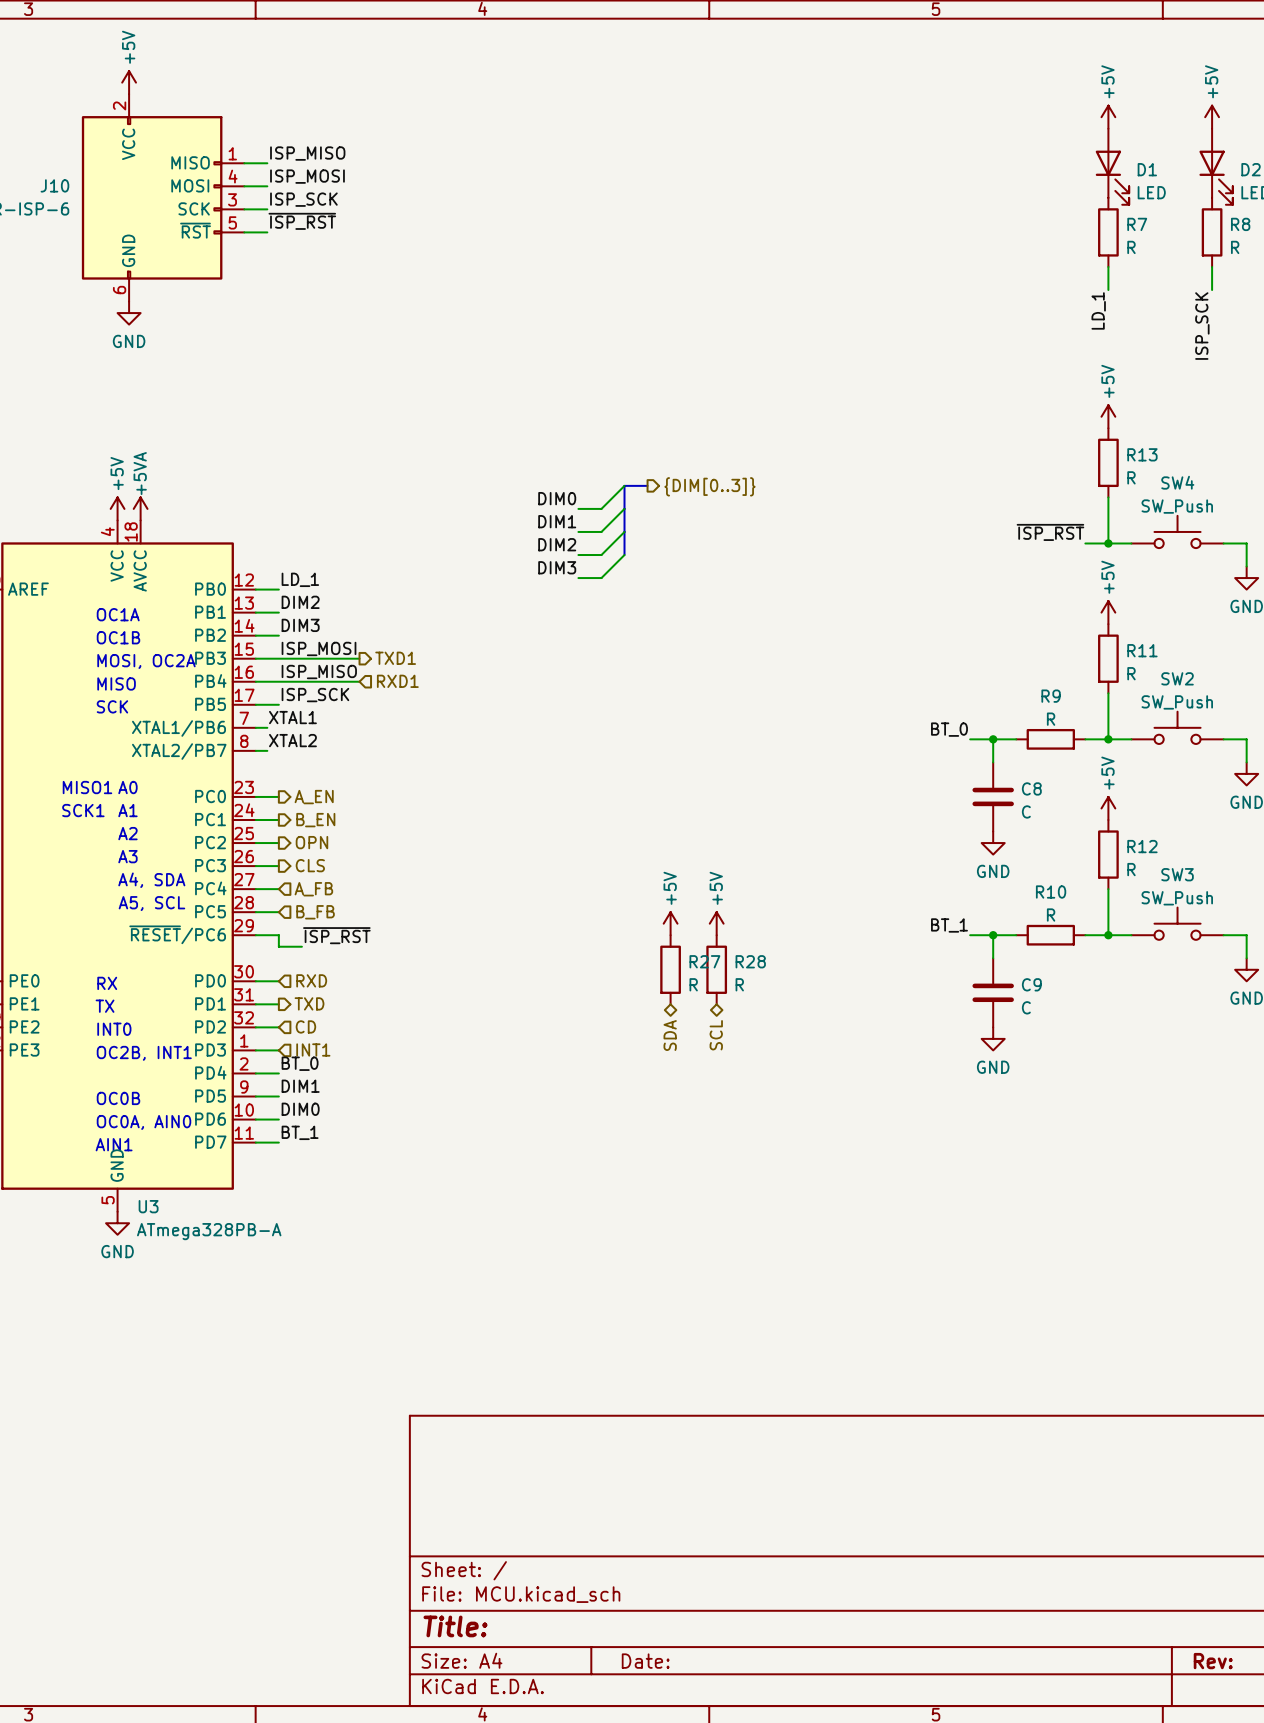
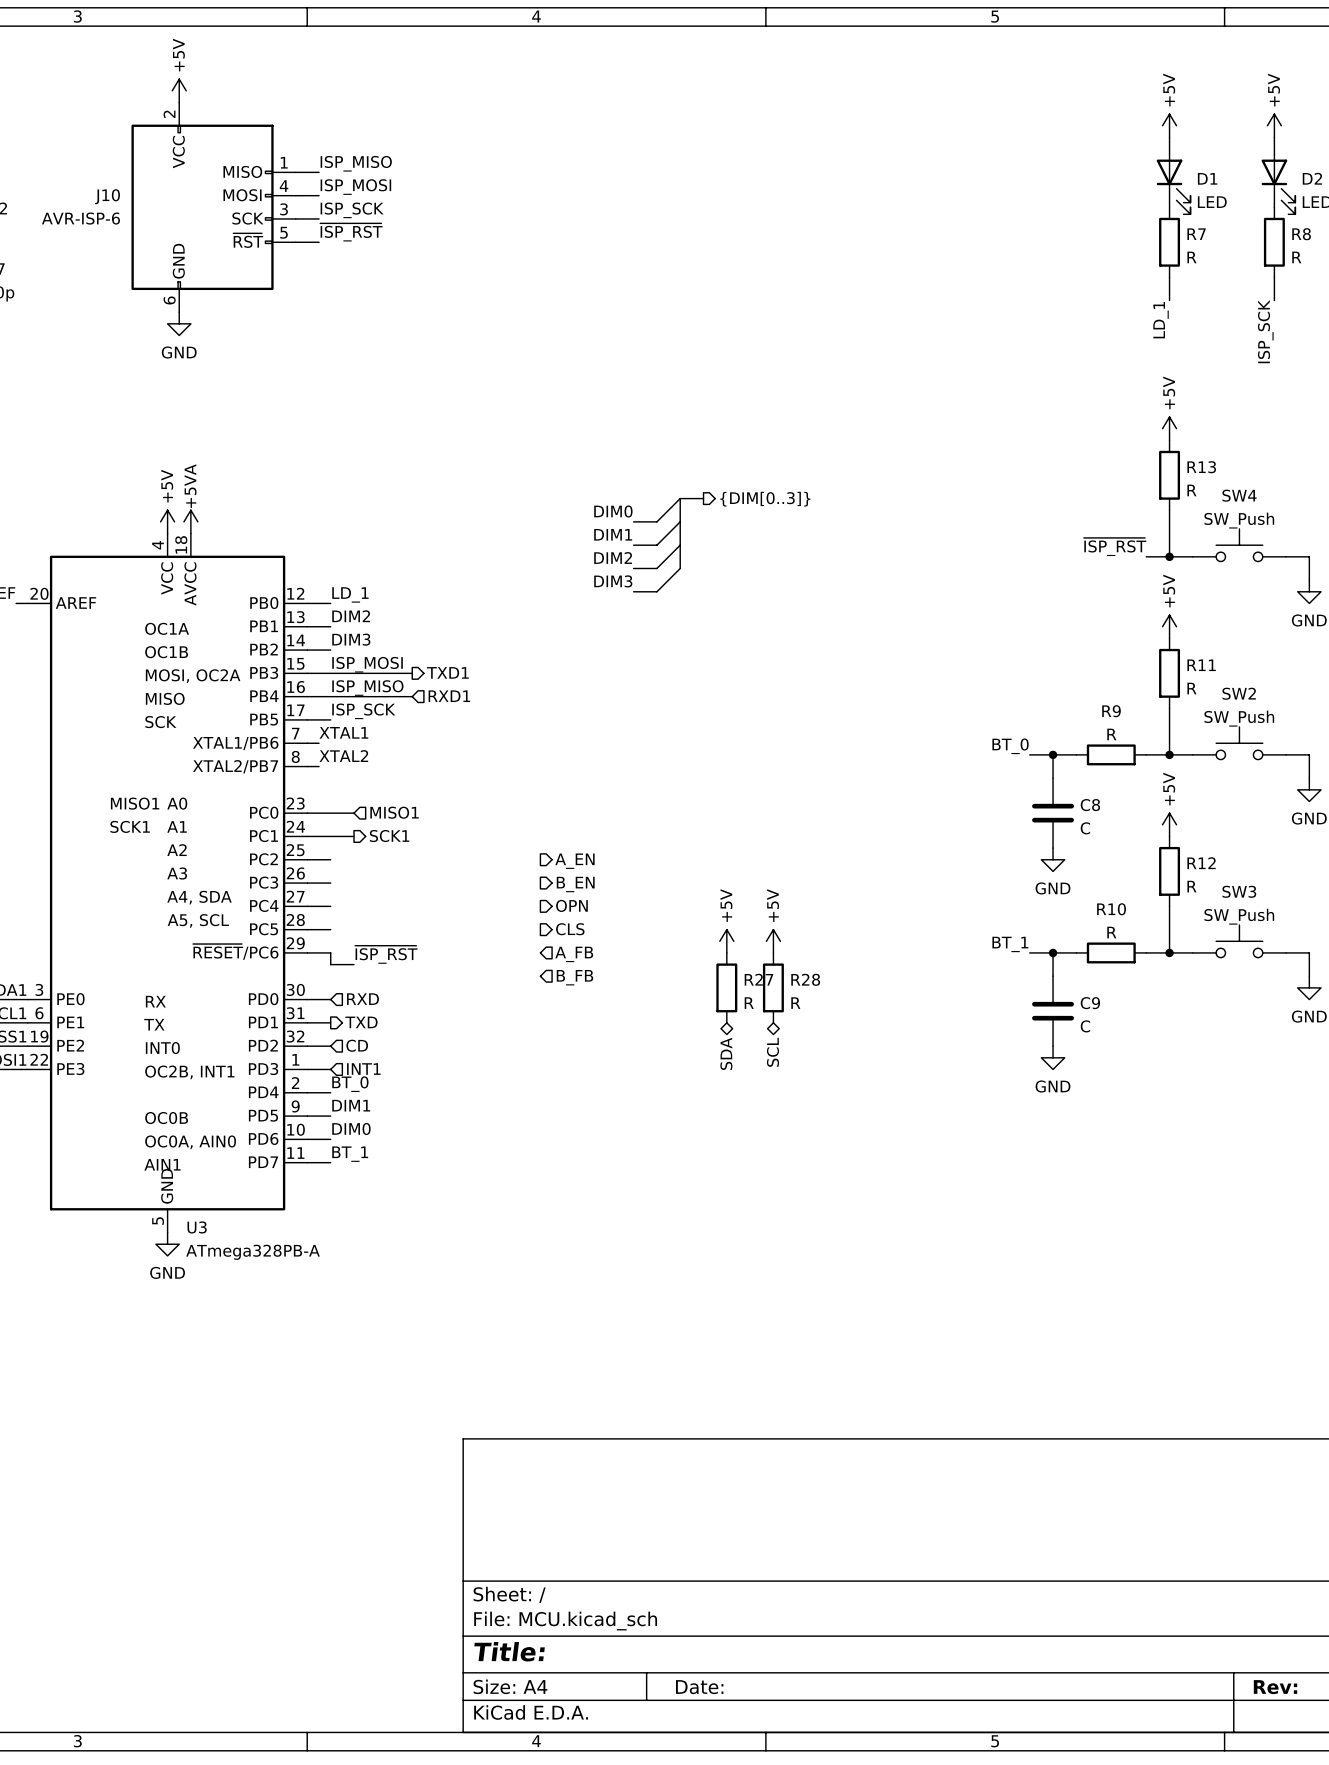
wire: none -> (330, 813) (354, 813)
hierarchical label: none -> MISO1 (394, 812)
hierarchical label position: A_EN (314, 797) -> A_EN (574, 861)
hierarchical label: none -> SCK1 (389, 836)
wire: none -> (330, 836) (354, 836)
hierarchical label position: B_EN (315, 820) -> B_EN (575, 884)
hierarchical label position: OPN (311, 842) -> OPN (571, 905)
hierarchical label position: CLS (310, 865) -> CLS (570, 929)
hierarchical label position: A_FB (313, 889) -> A_FB (574, 954)
hierarchical label position: B_FB (315, 912) -> B_FB (574, 977)

